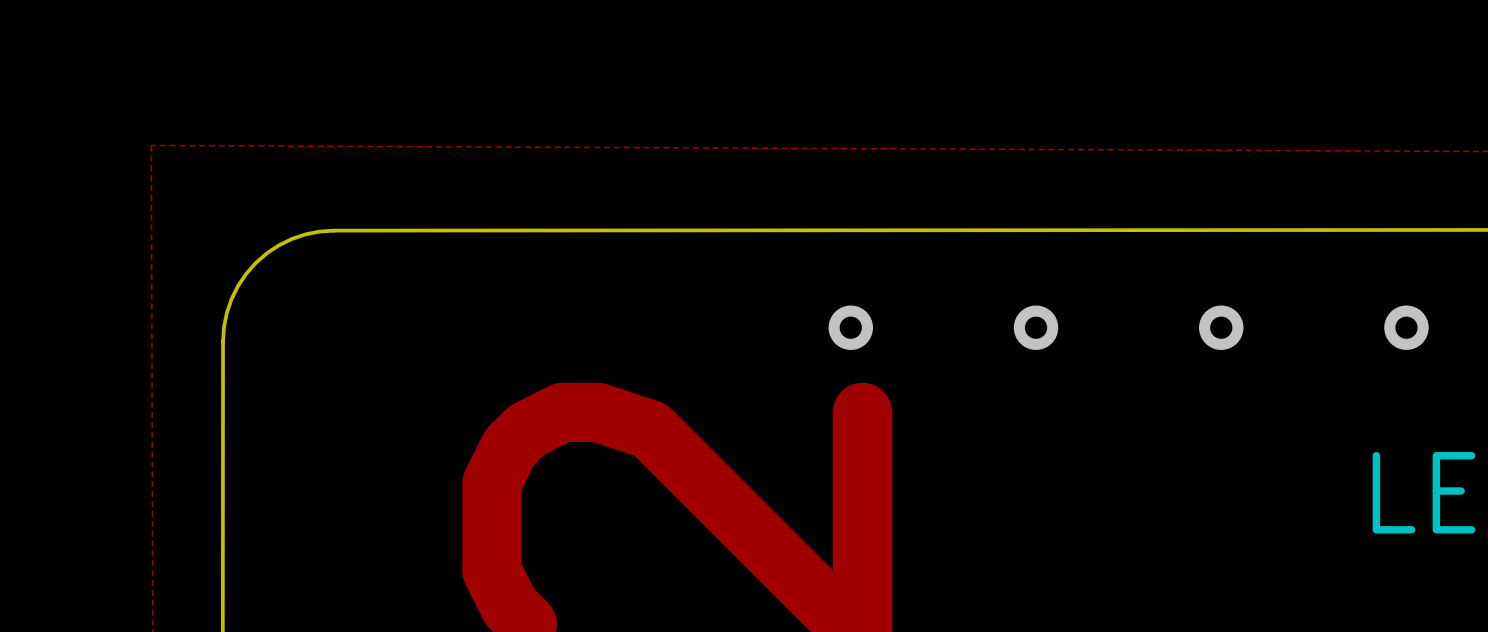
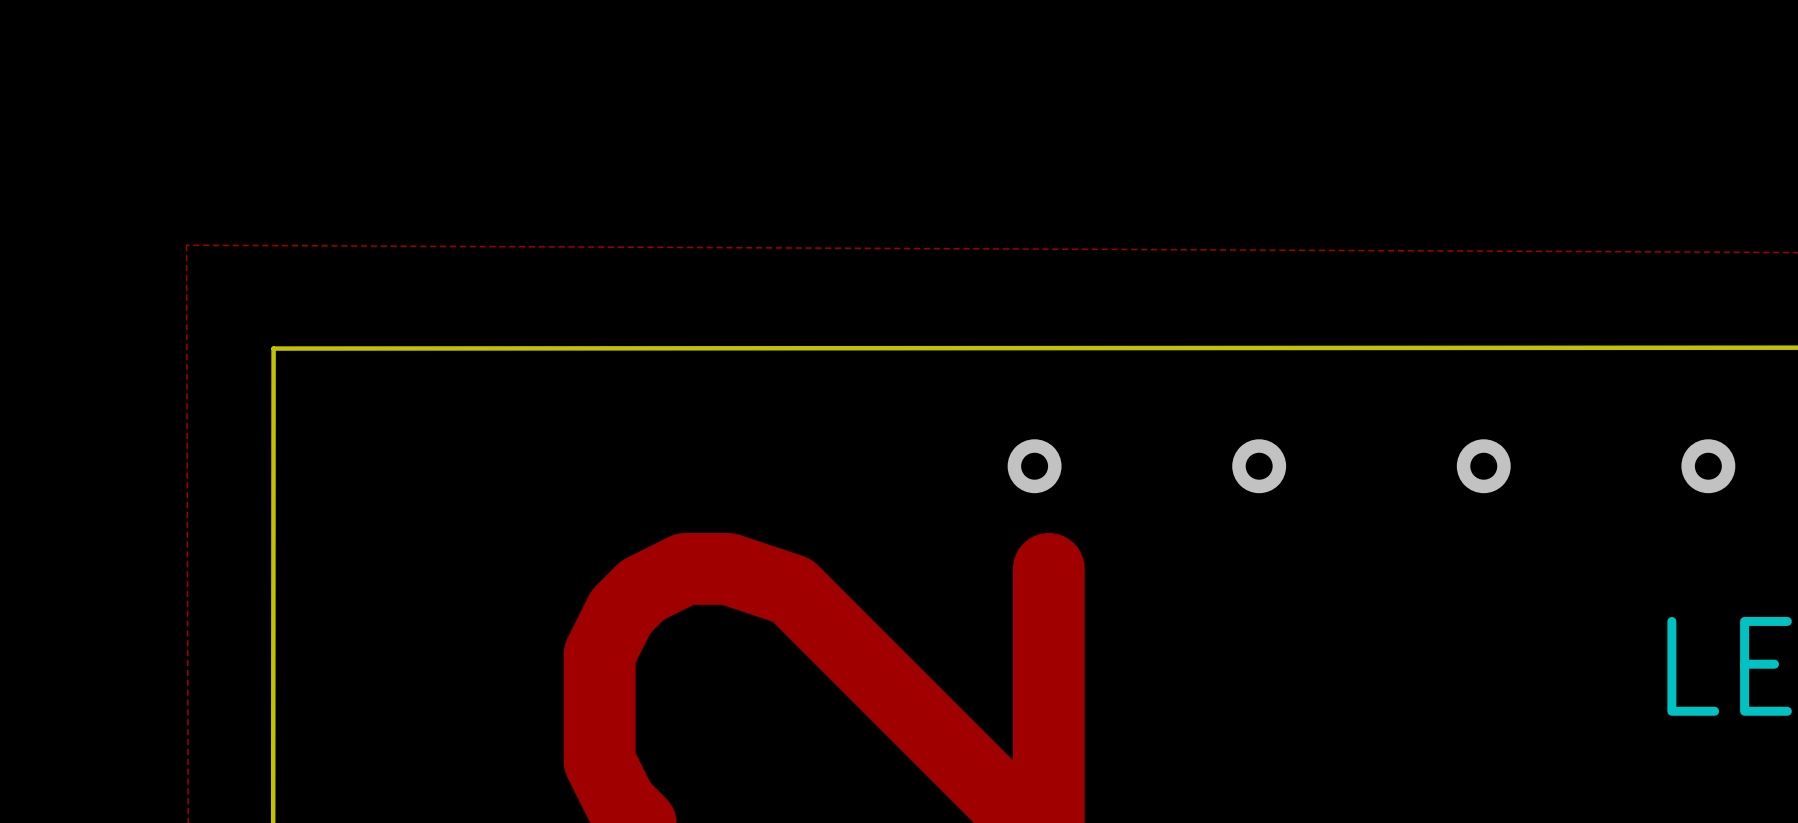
board edge: (334, 230) (319, 231) (291, 239) (278, 245) (255, 263) (246, 274) (231, 299) (224, 327) (223, 341) -> (408, 348) (273, 348) (273, 483)

